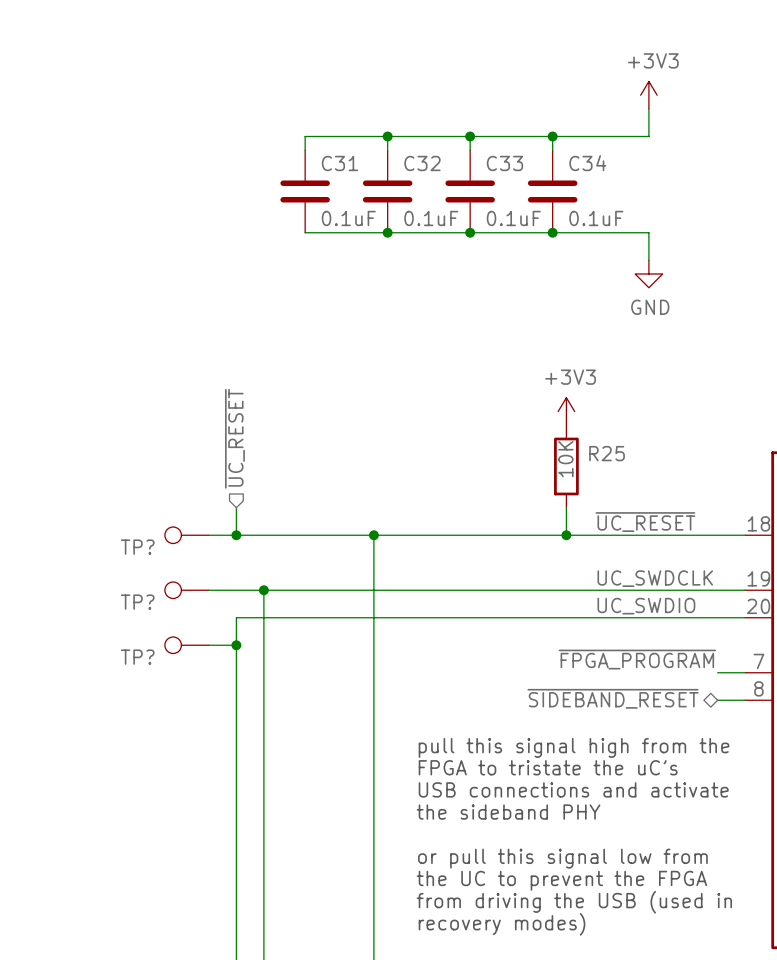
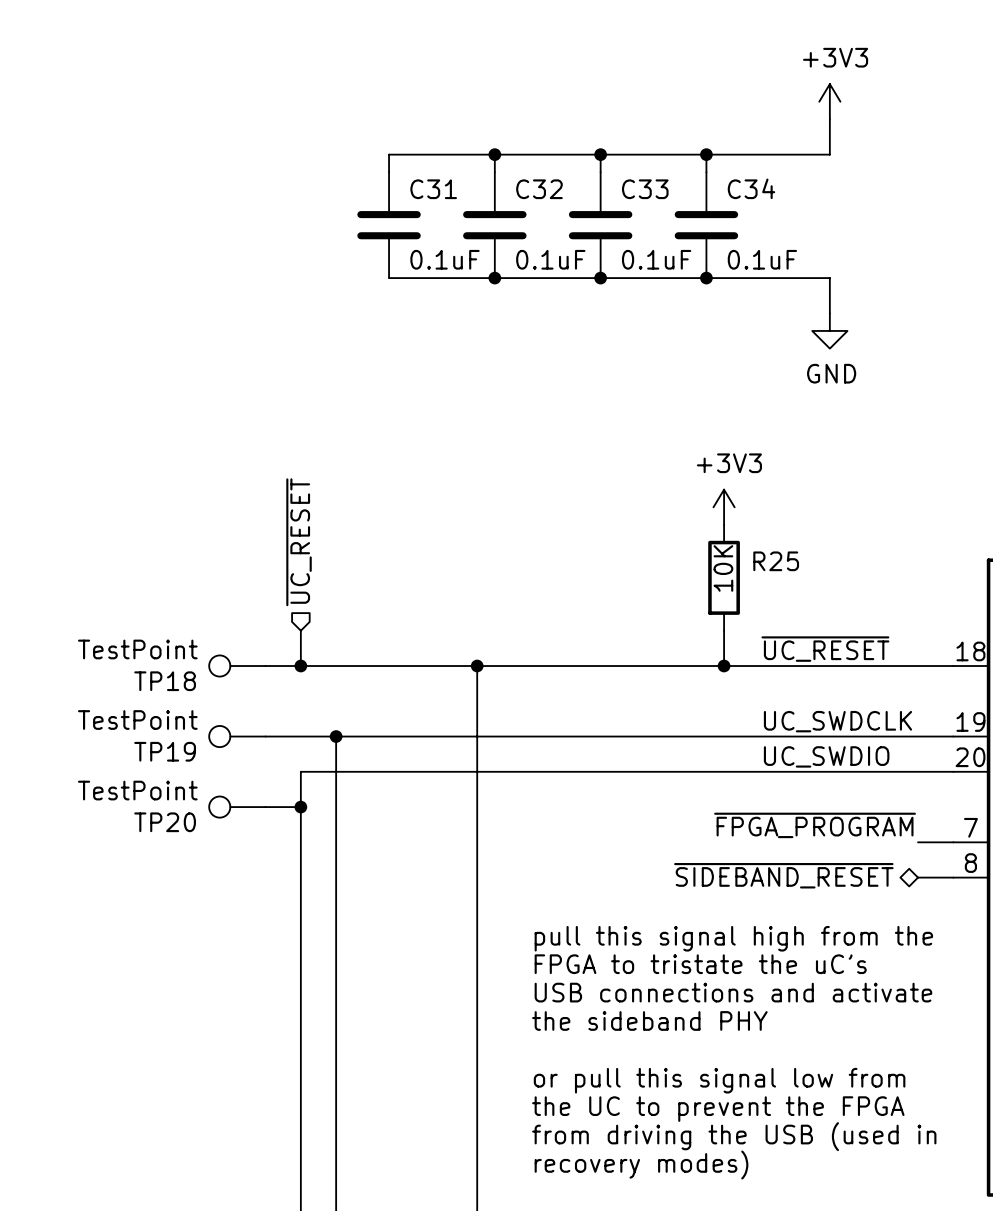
TP? value: none -> TestPoint (137, 649)
TP? name: TP? (137, 547) -> TP18 (165, 681)
TP? value: none -> TestPoint (137, 720)
TP? name: TP? (137, 602) -> TP19 (165, 751)
TP? value: none -> TestPoint (137, 790)
TP? name: TP? (137, 657) -> TP20 (165, 822)

